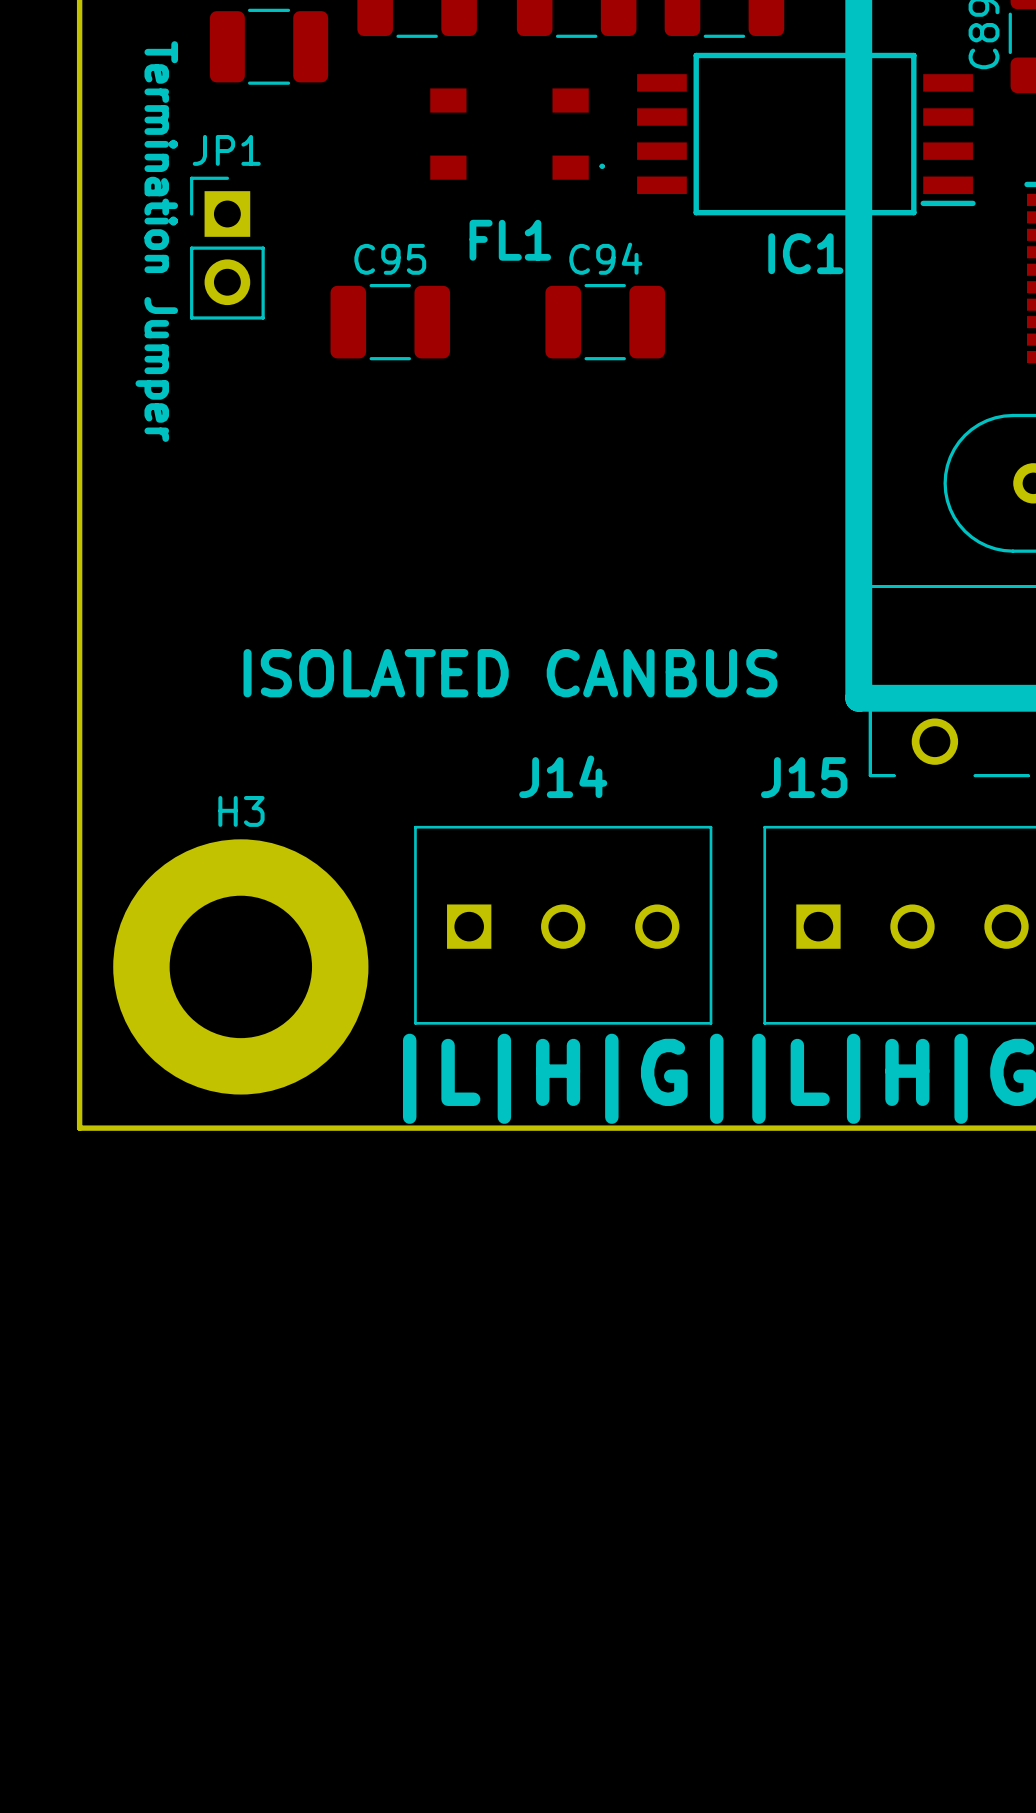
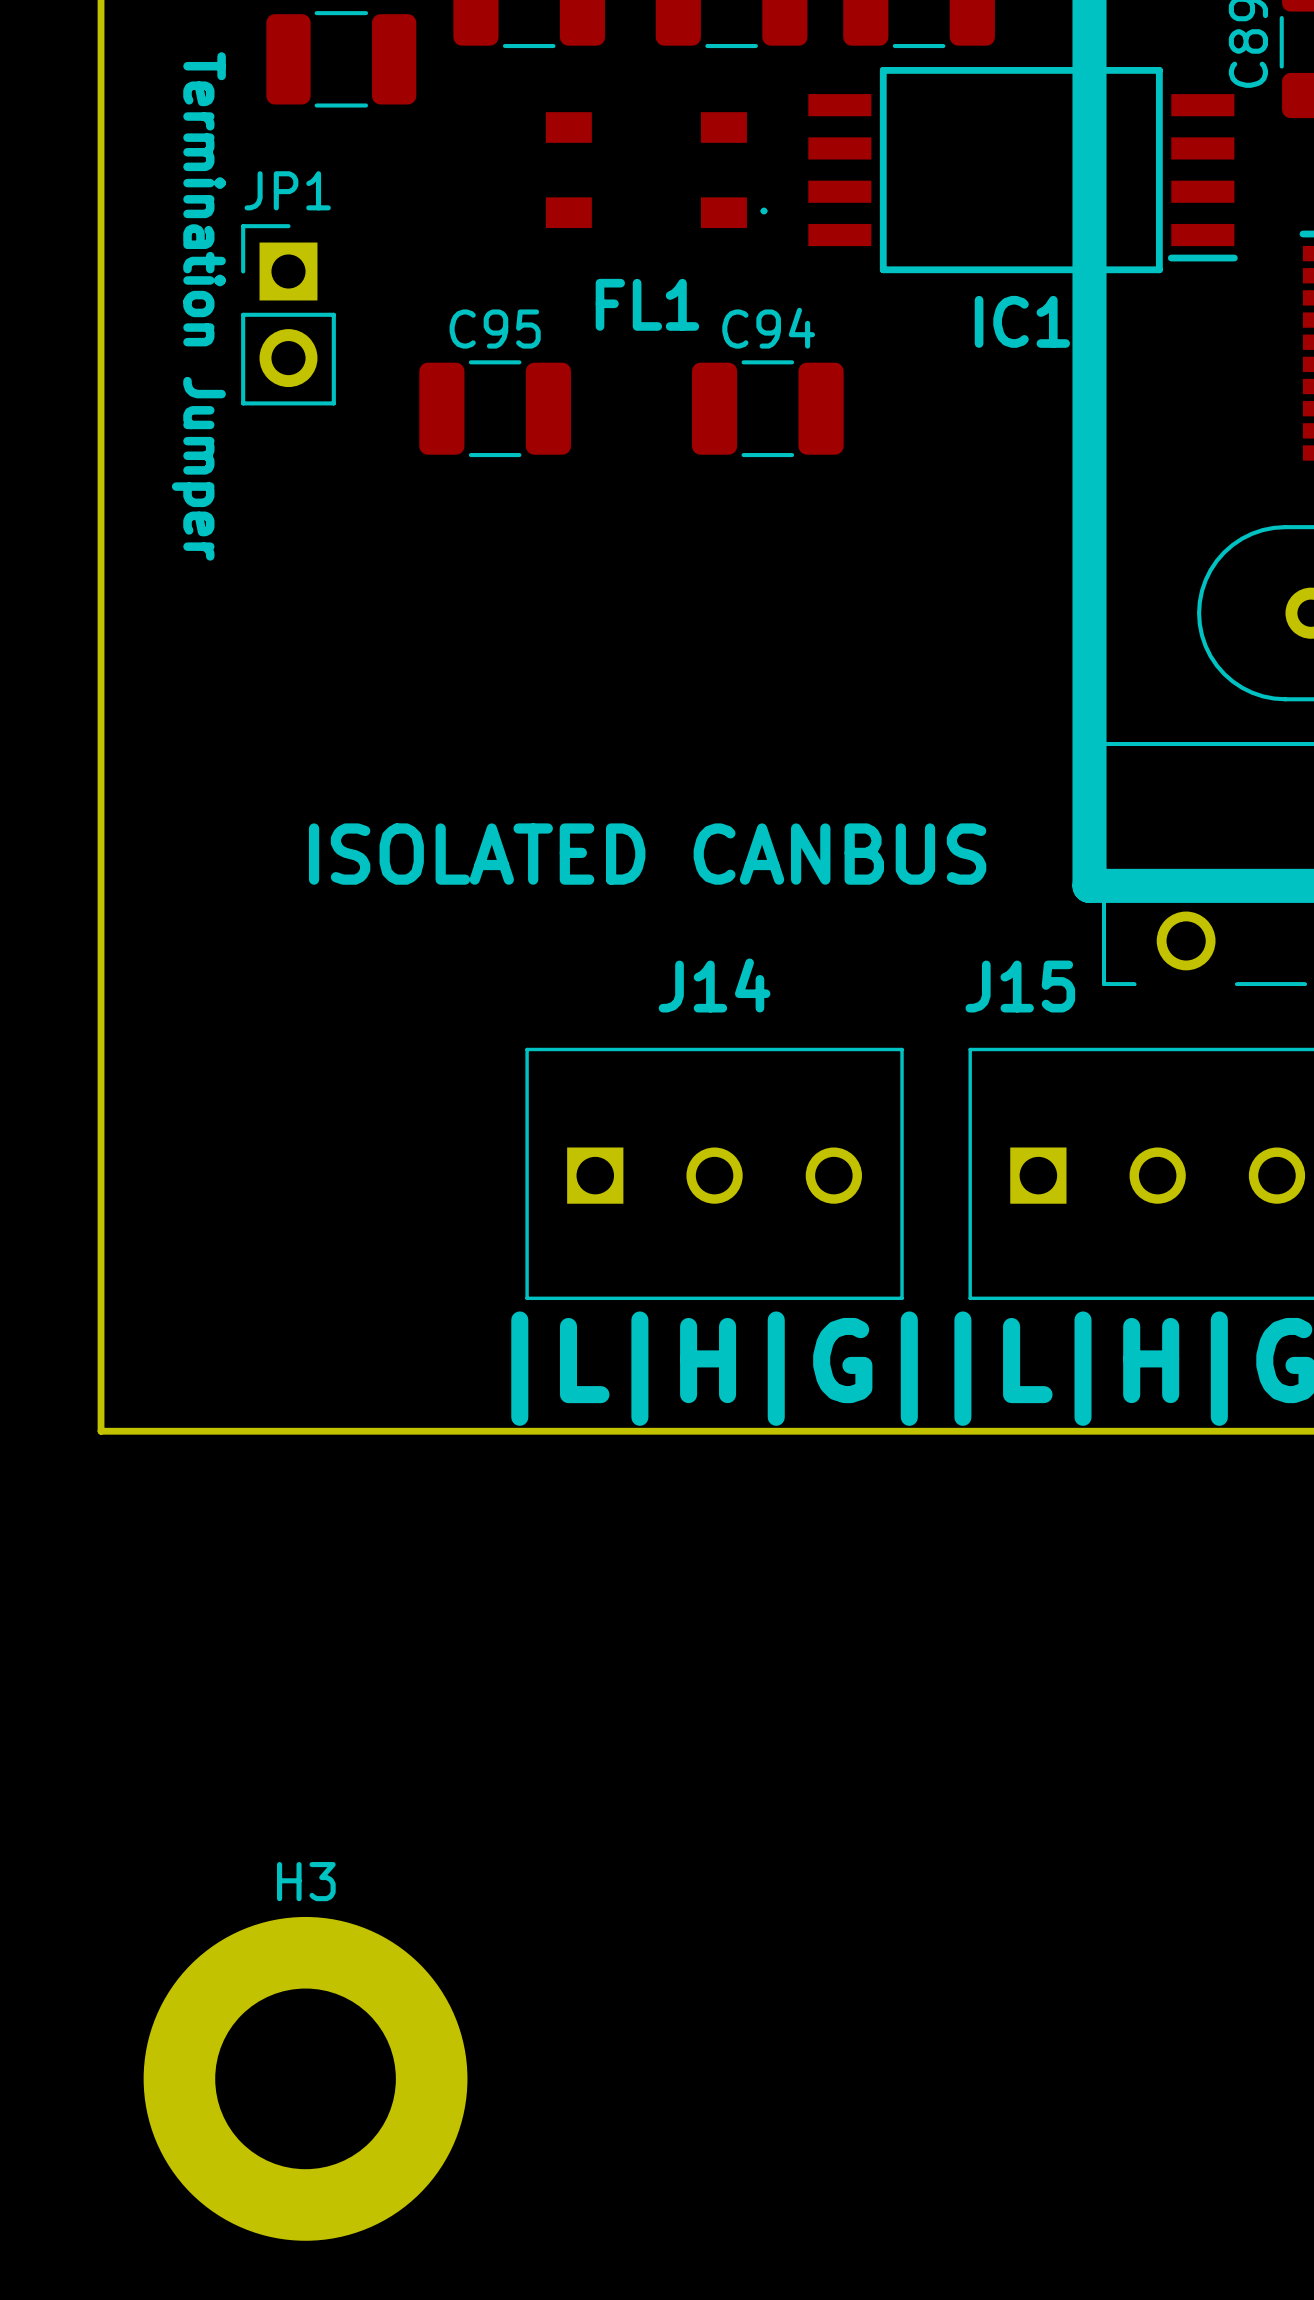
H3 position: (240, 966) -> (305, 2078)

